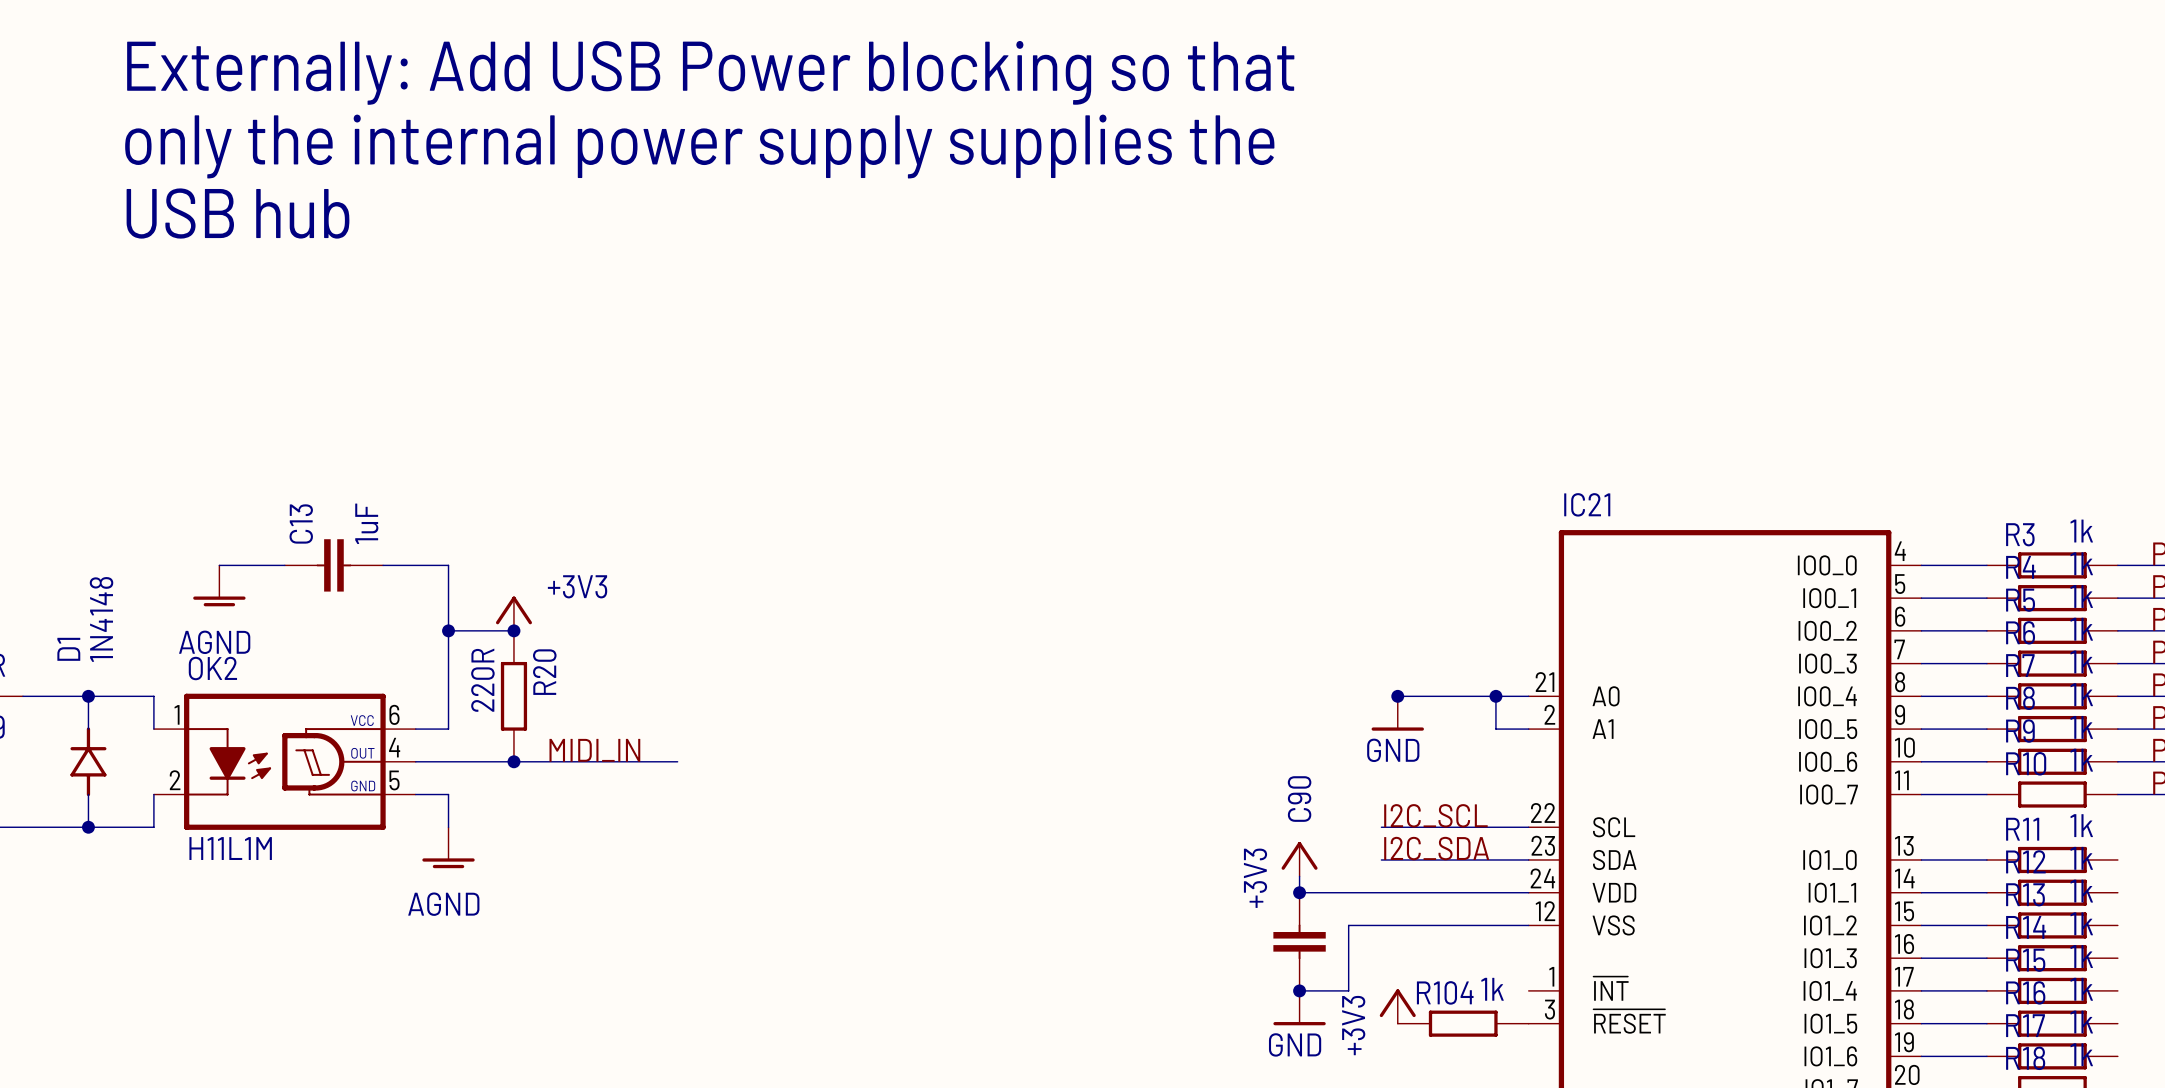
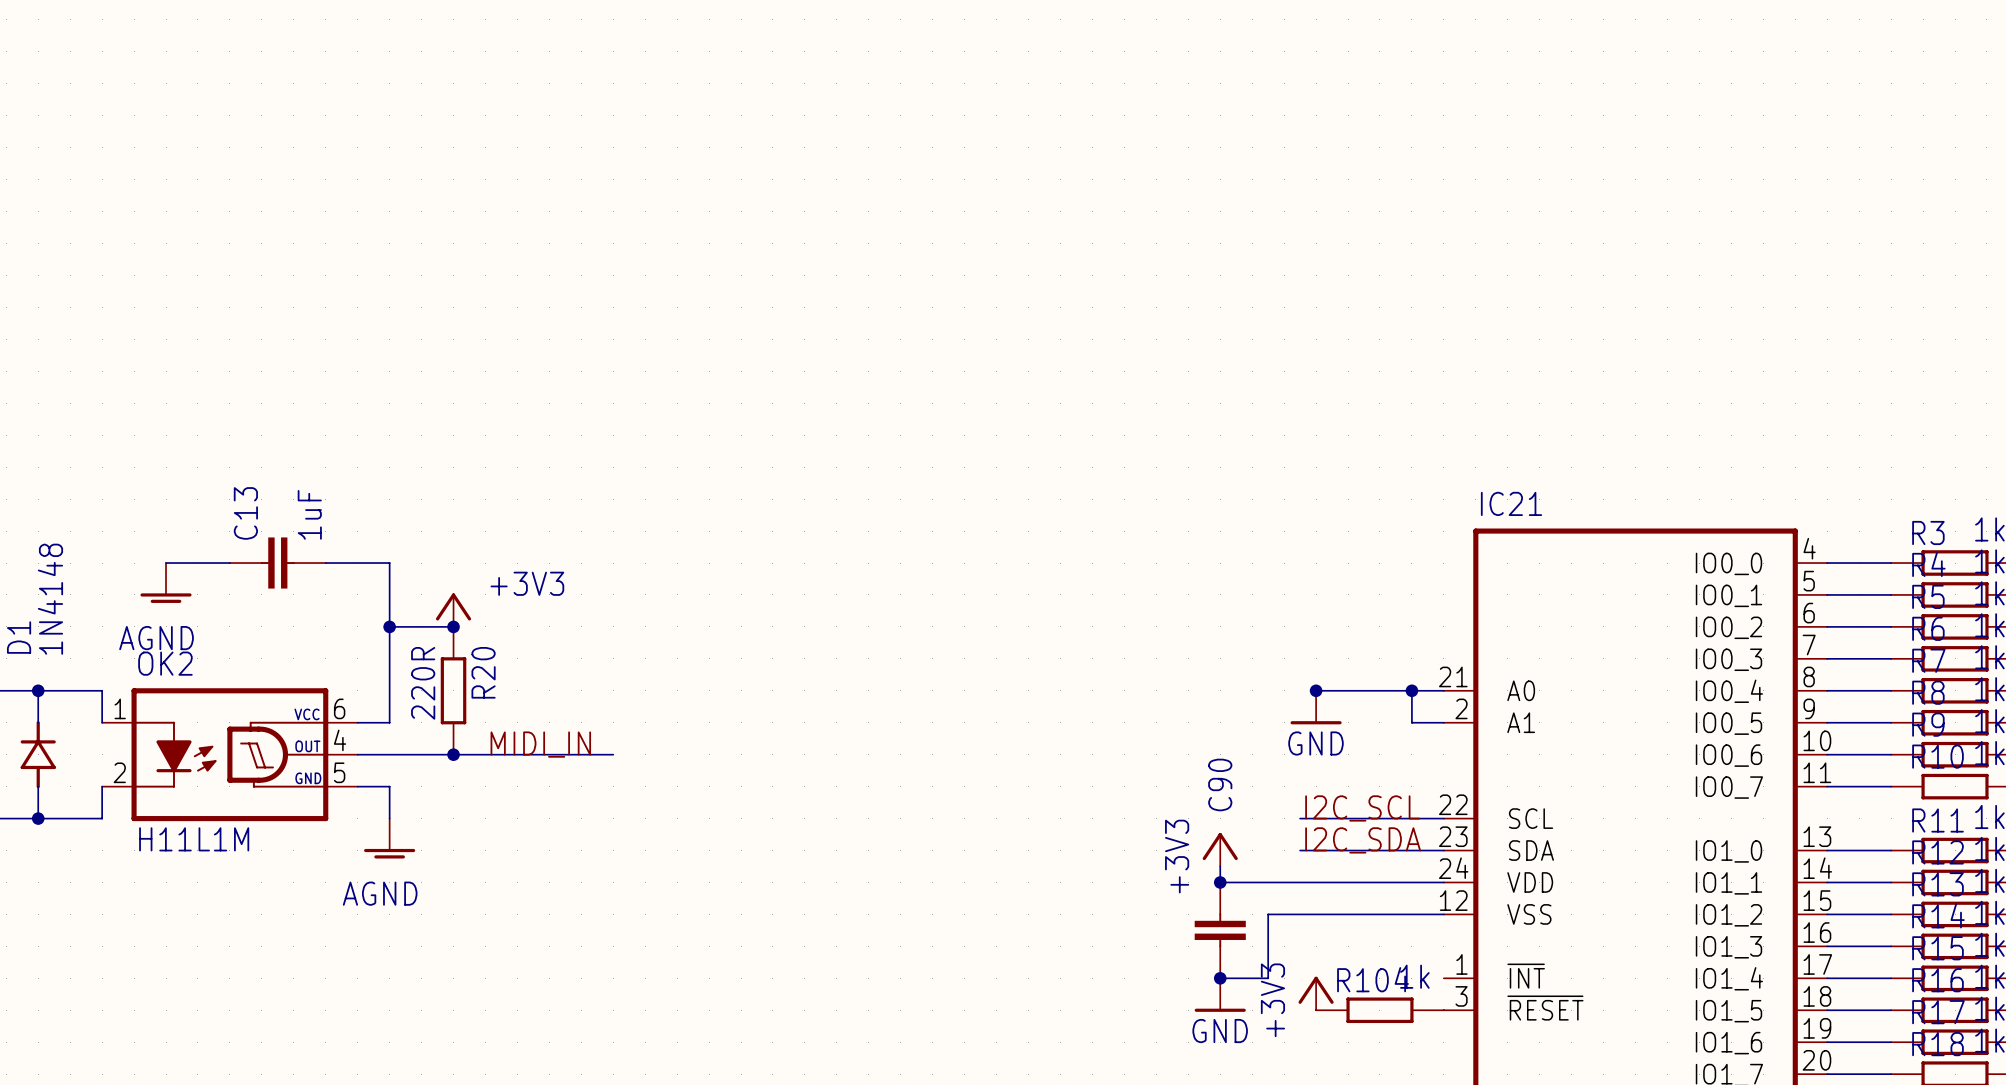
text: Externally: Add USB Power blocking so that (710, 72) -> none
text: only the internal power supply supplies the (699, 146) -> none
text: USB hub (238, 213) -> none

